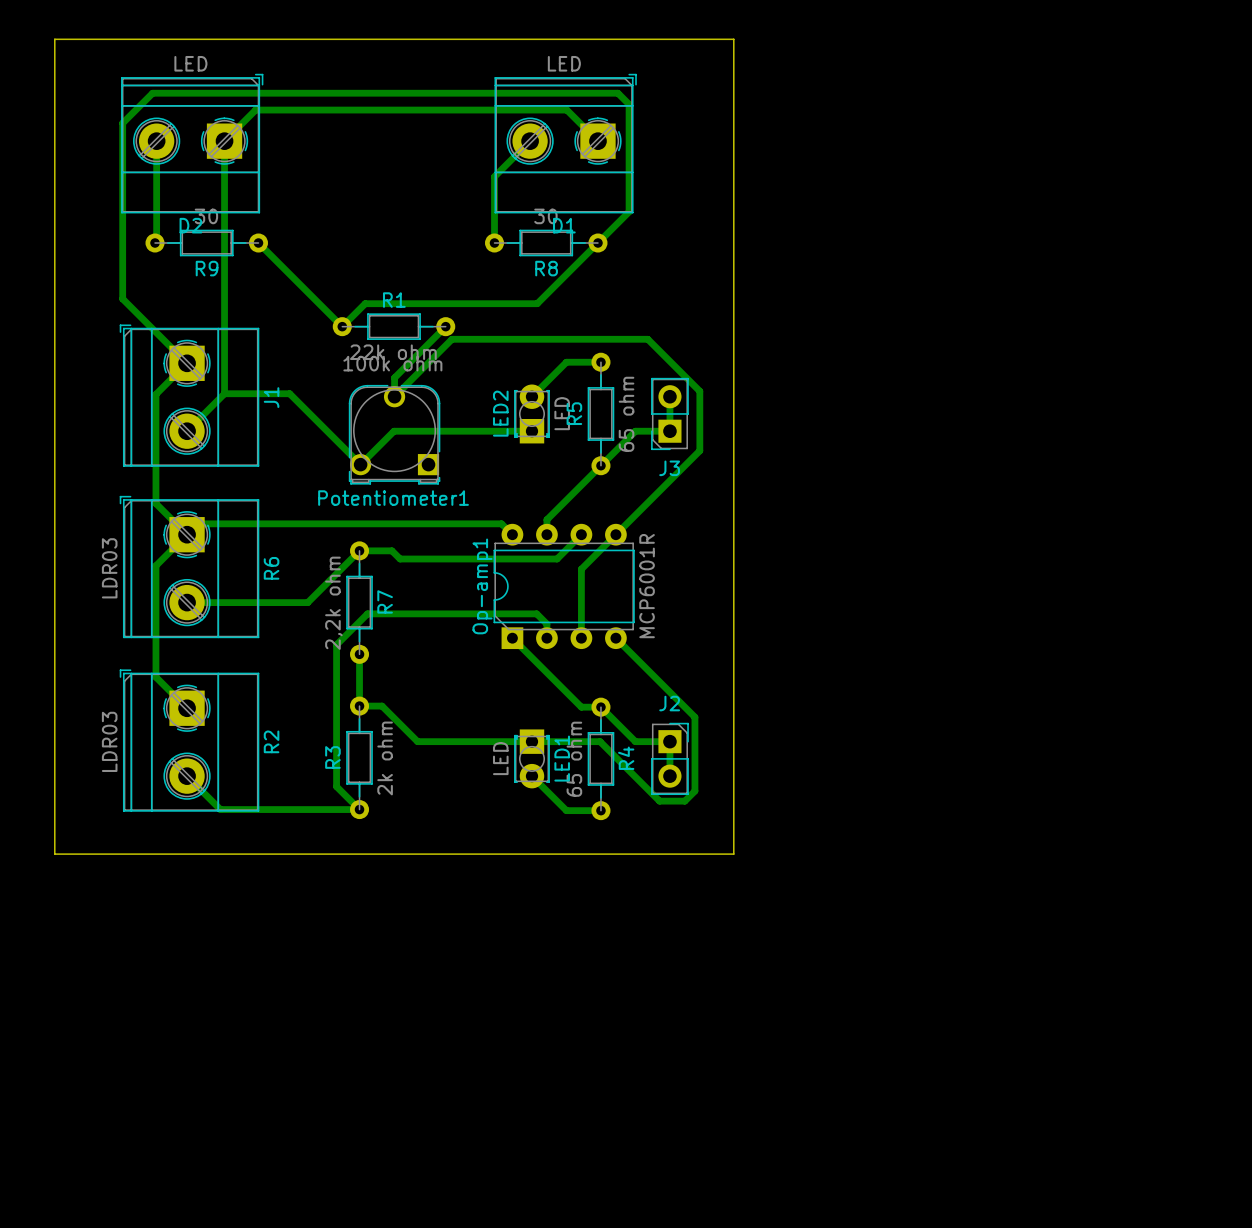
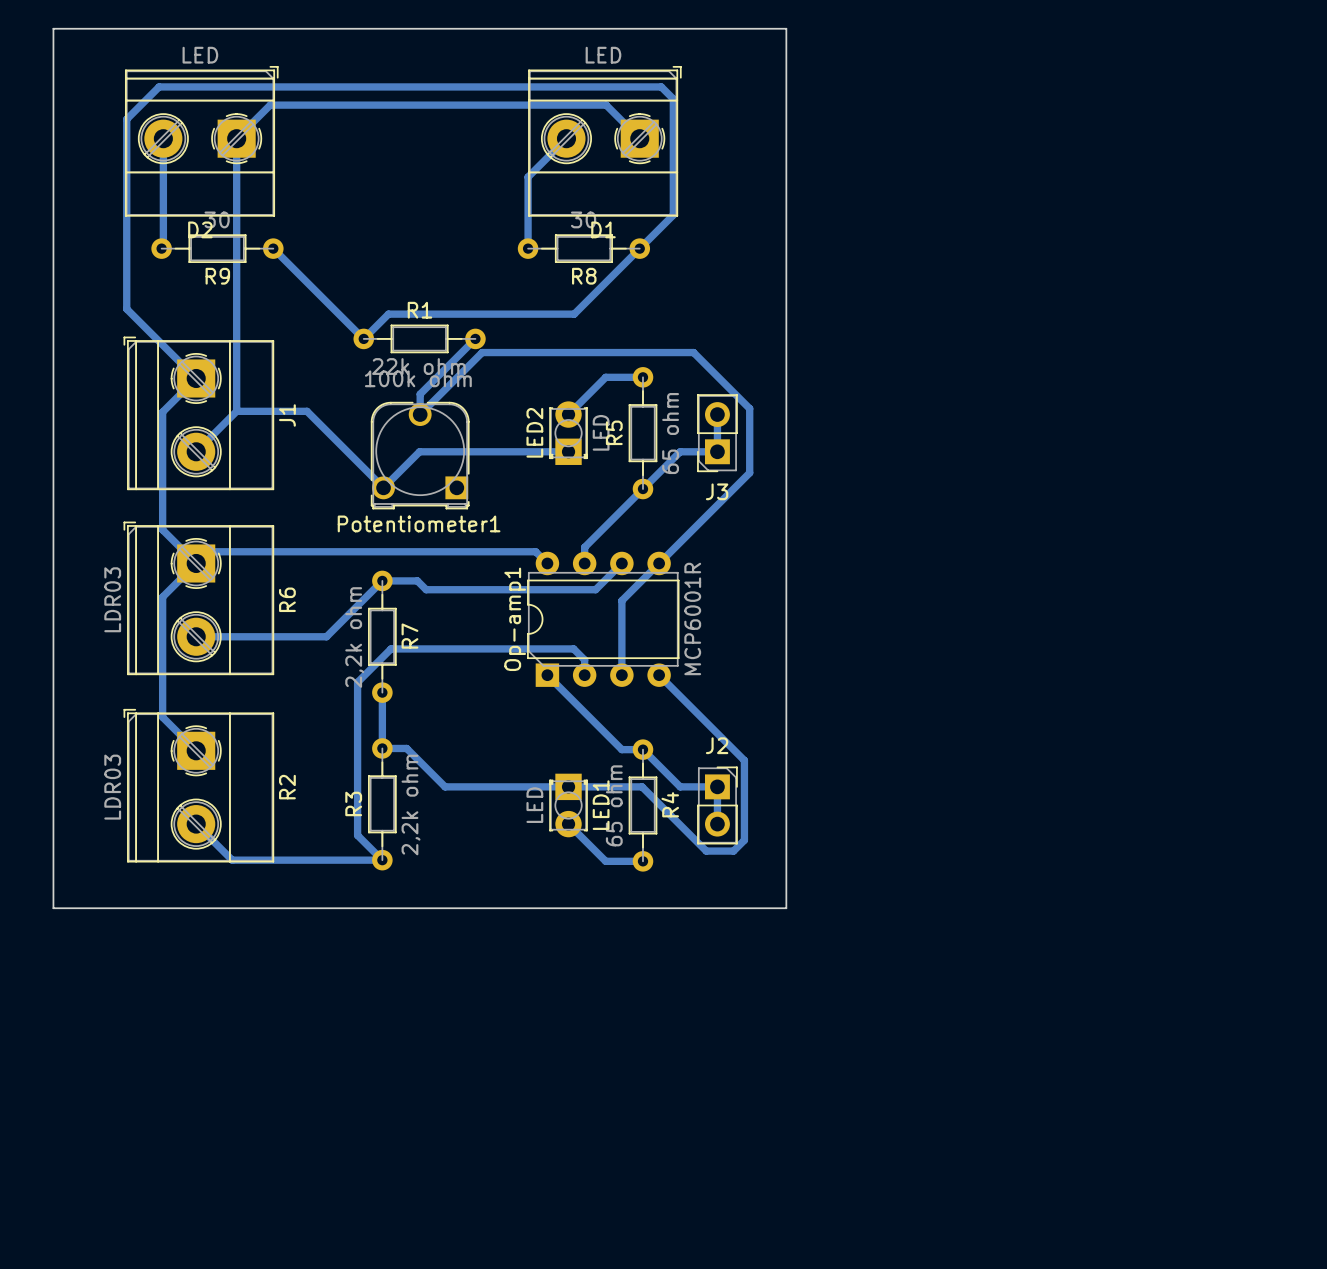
R3 value: 2k ohm (385, 758) -> 2,2k ohm (411, 805)

